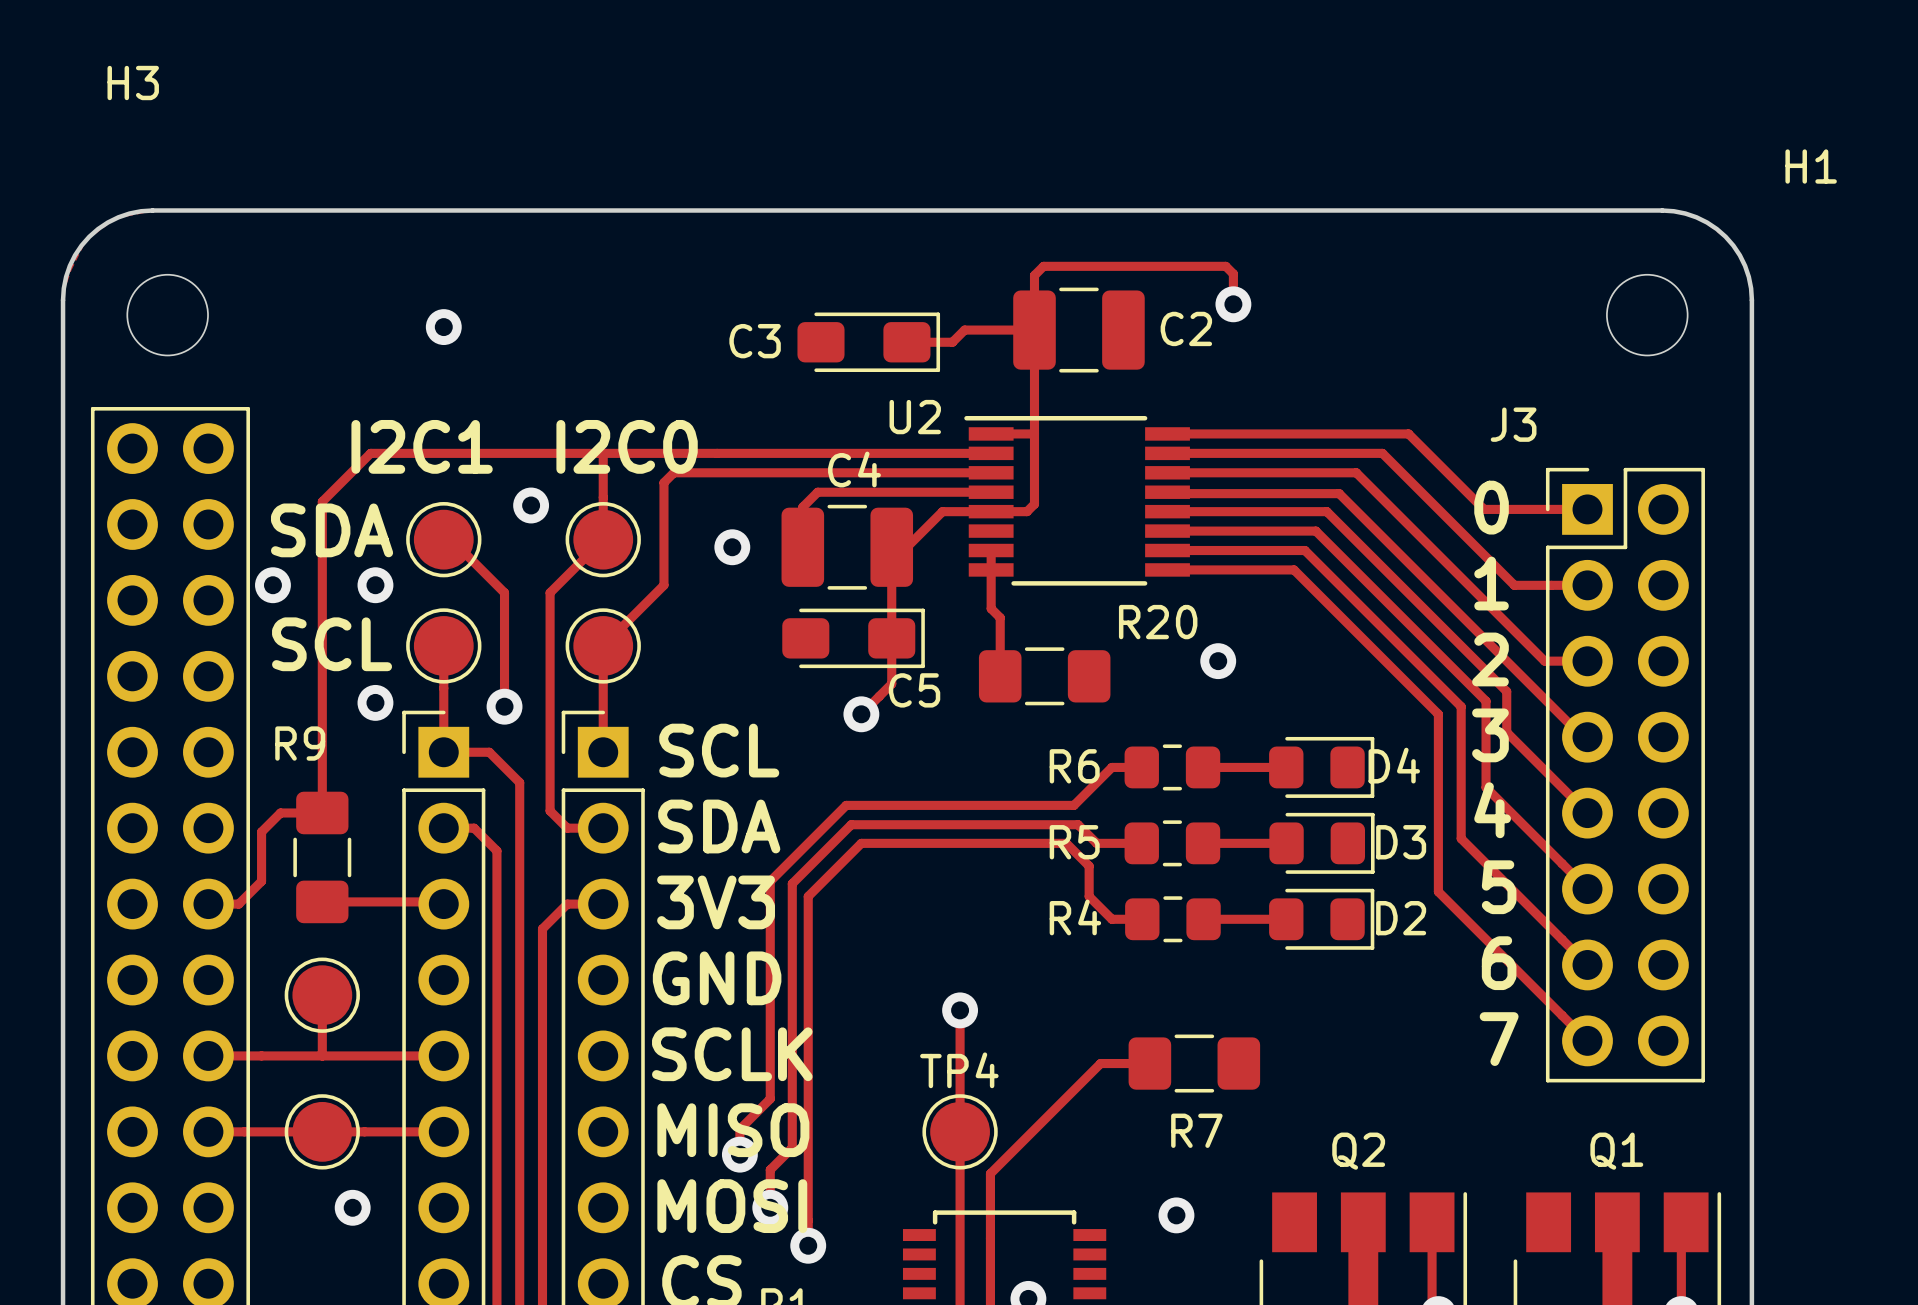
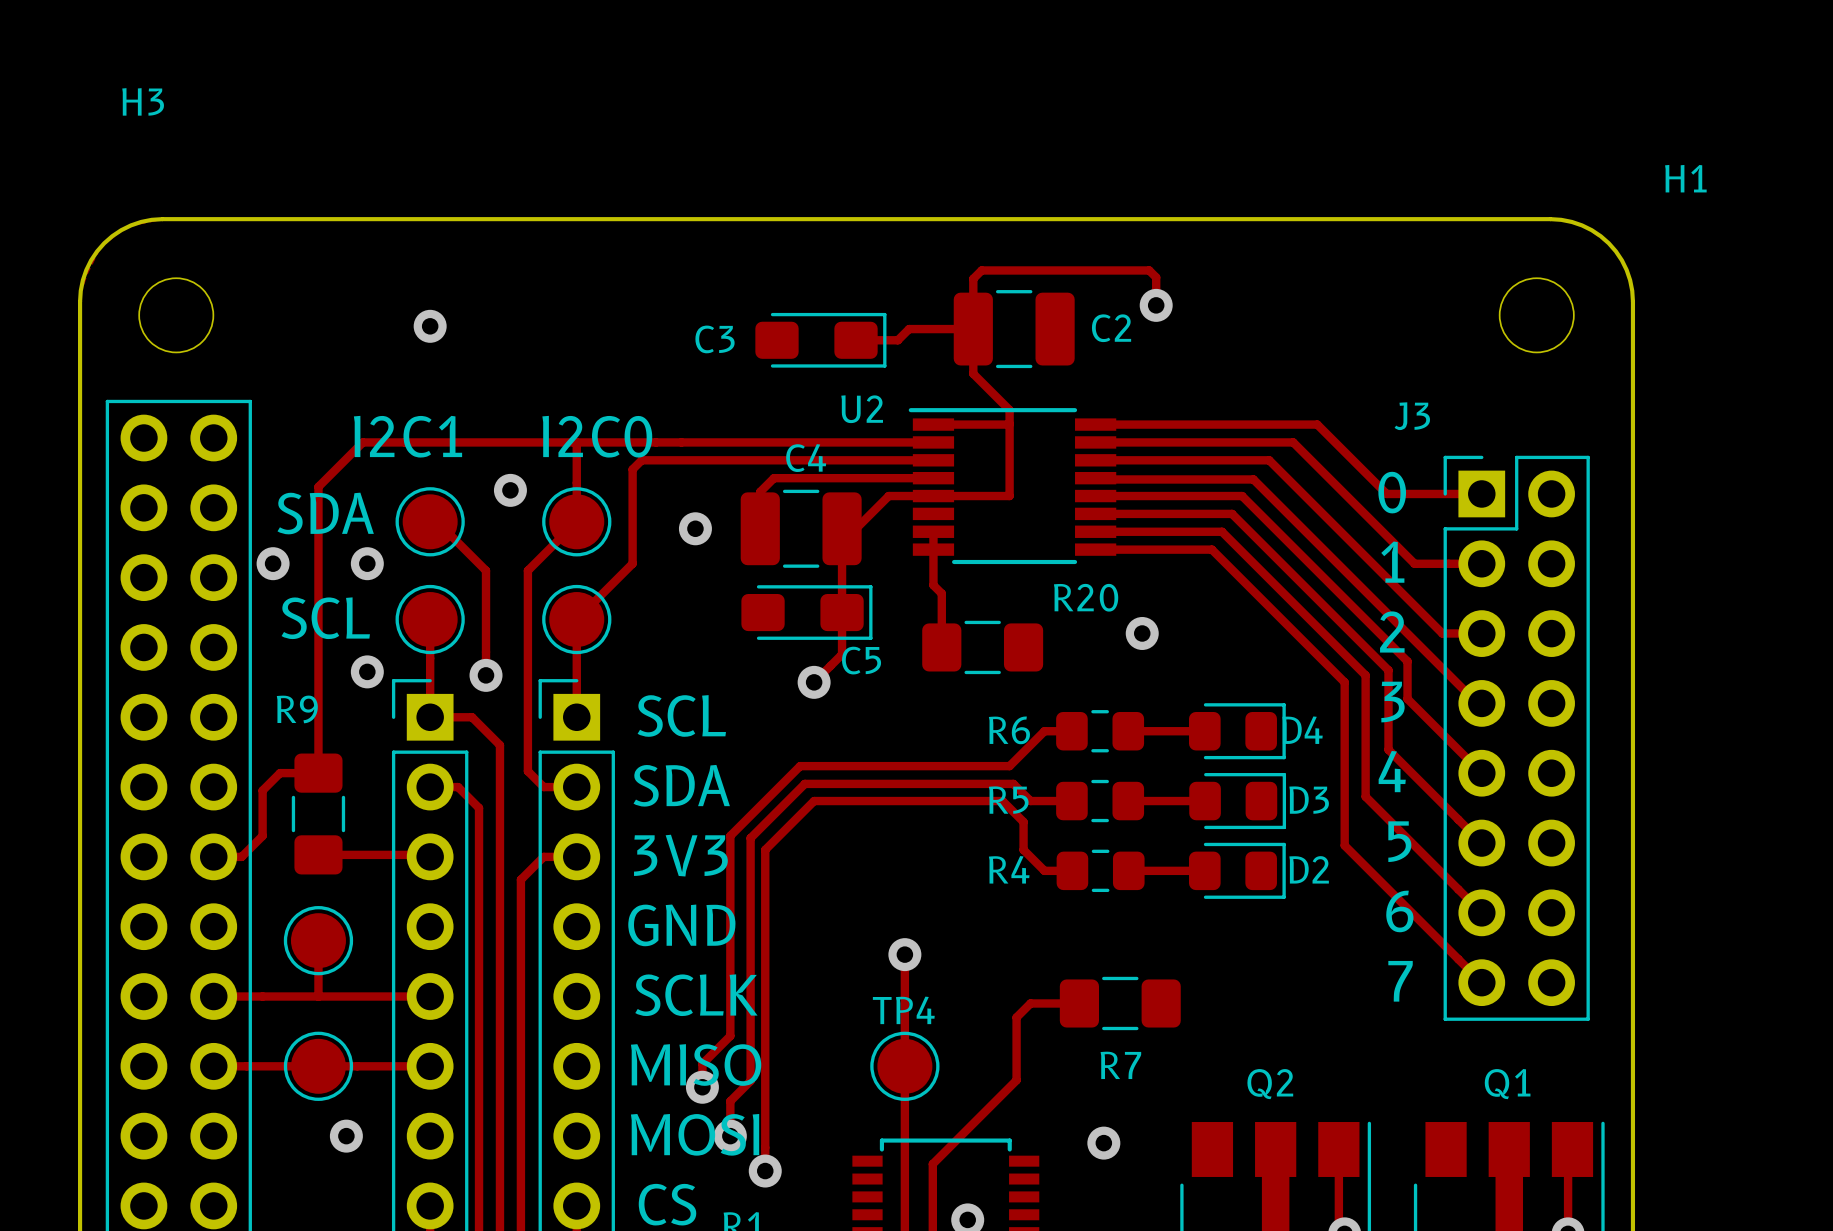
track: (1034, 378) (1034, 504) (1027, 511) -> (973, 373) (1009, 410) (1009, 496) (966, 496)
track: none -> (1009, 424) (973, 424)
track: (1100, 1063) (990, 1173) (990, 1238) -> (1034, 1003) (1030, 1003) (1016, 1017) (1016, 1080) (932, 1164)

